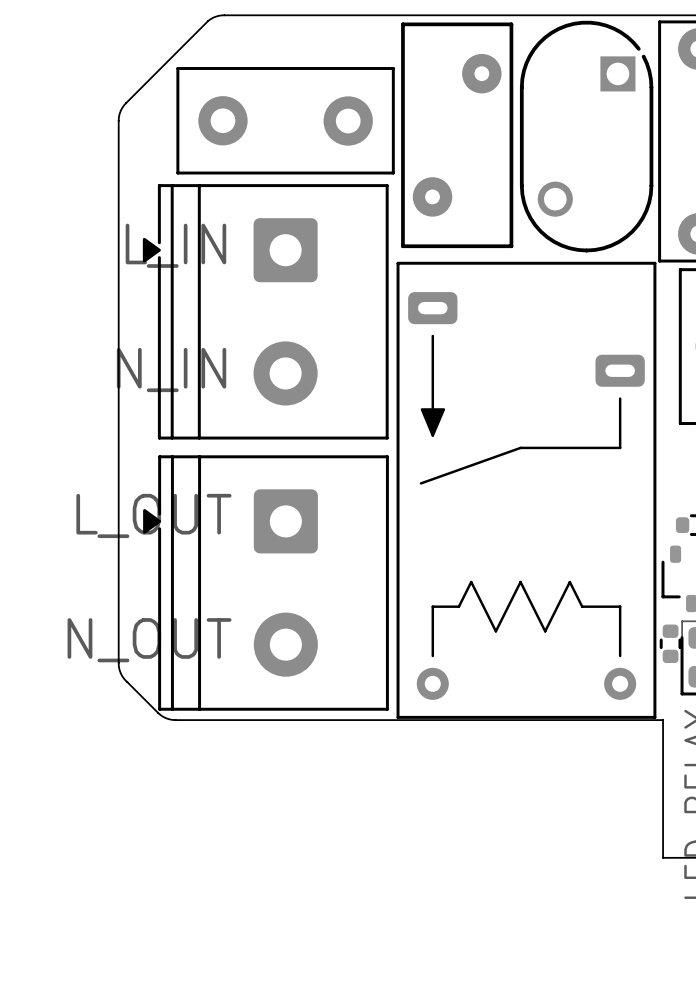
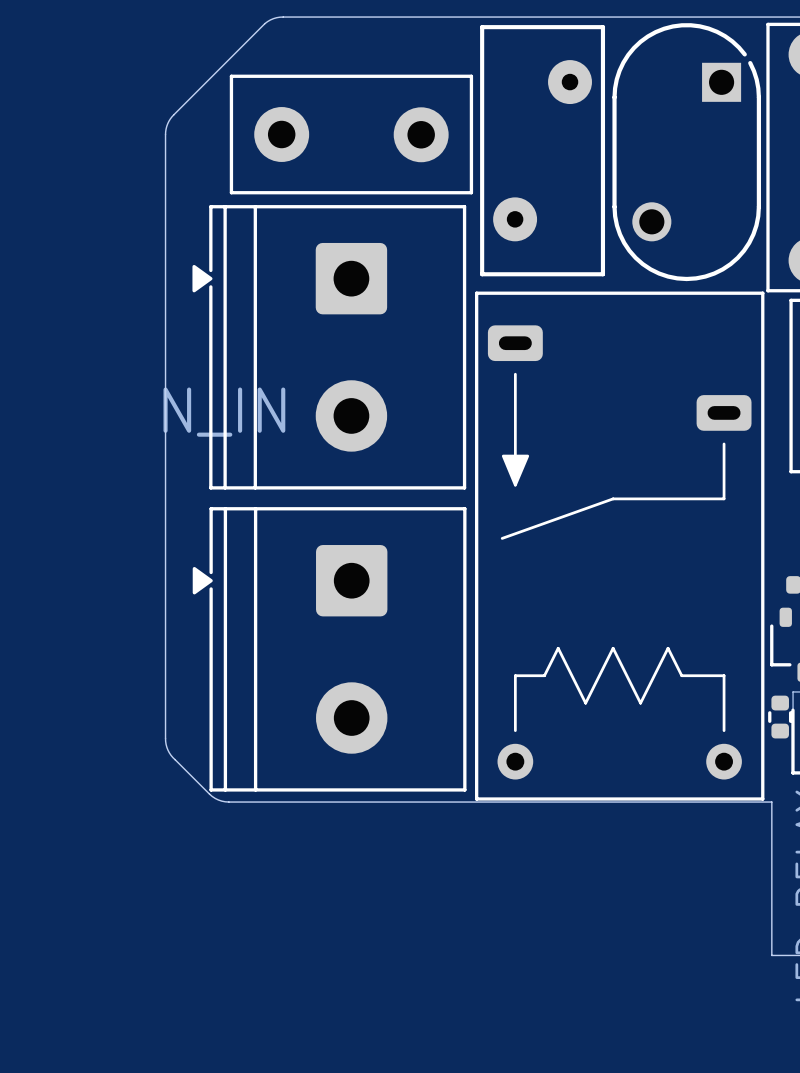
text: L_IN (175, 245) -> none
text: L_OUT (153, 515) -> none
text: N_OUT (149, 640) -> none

